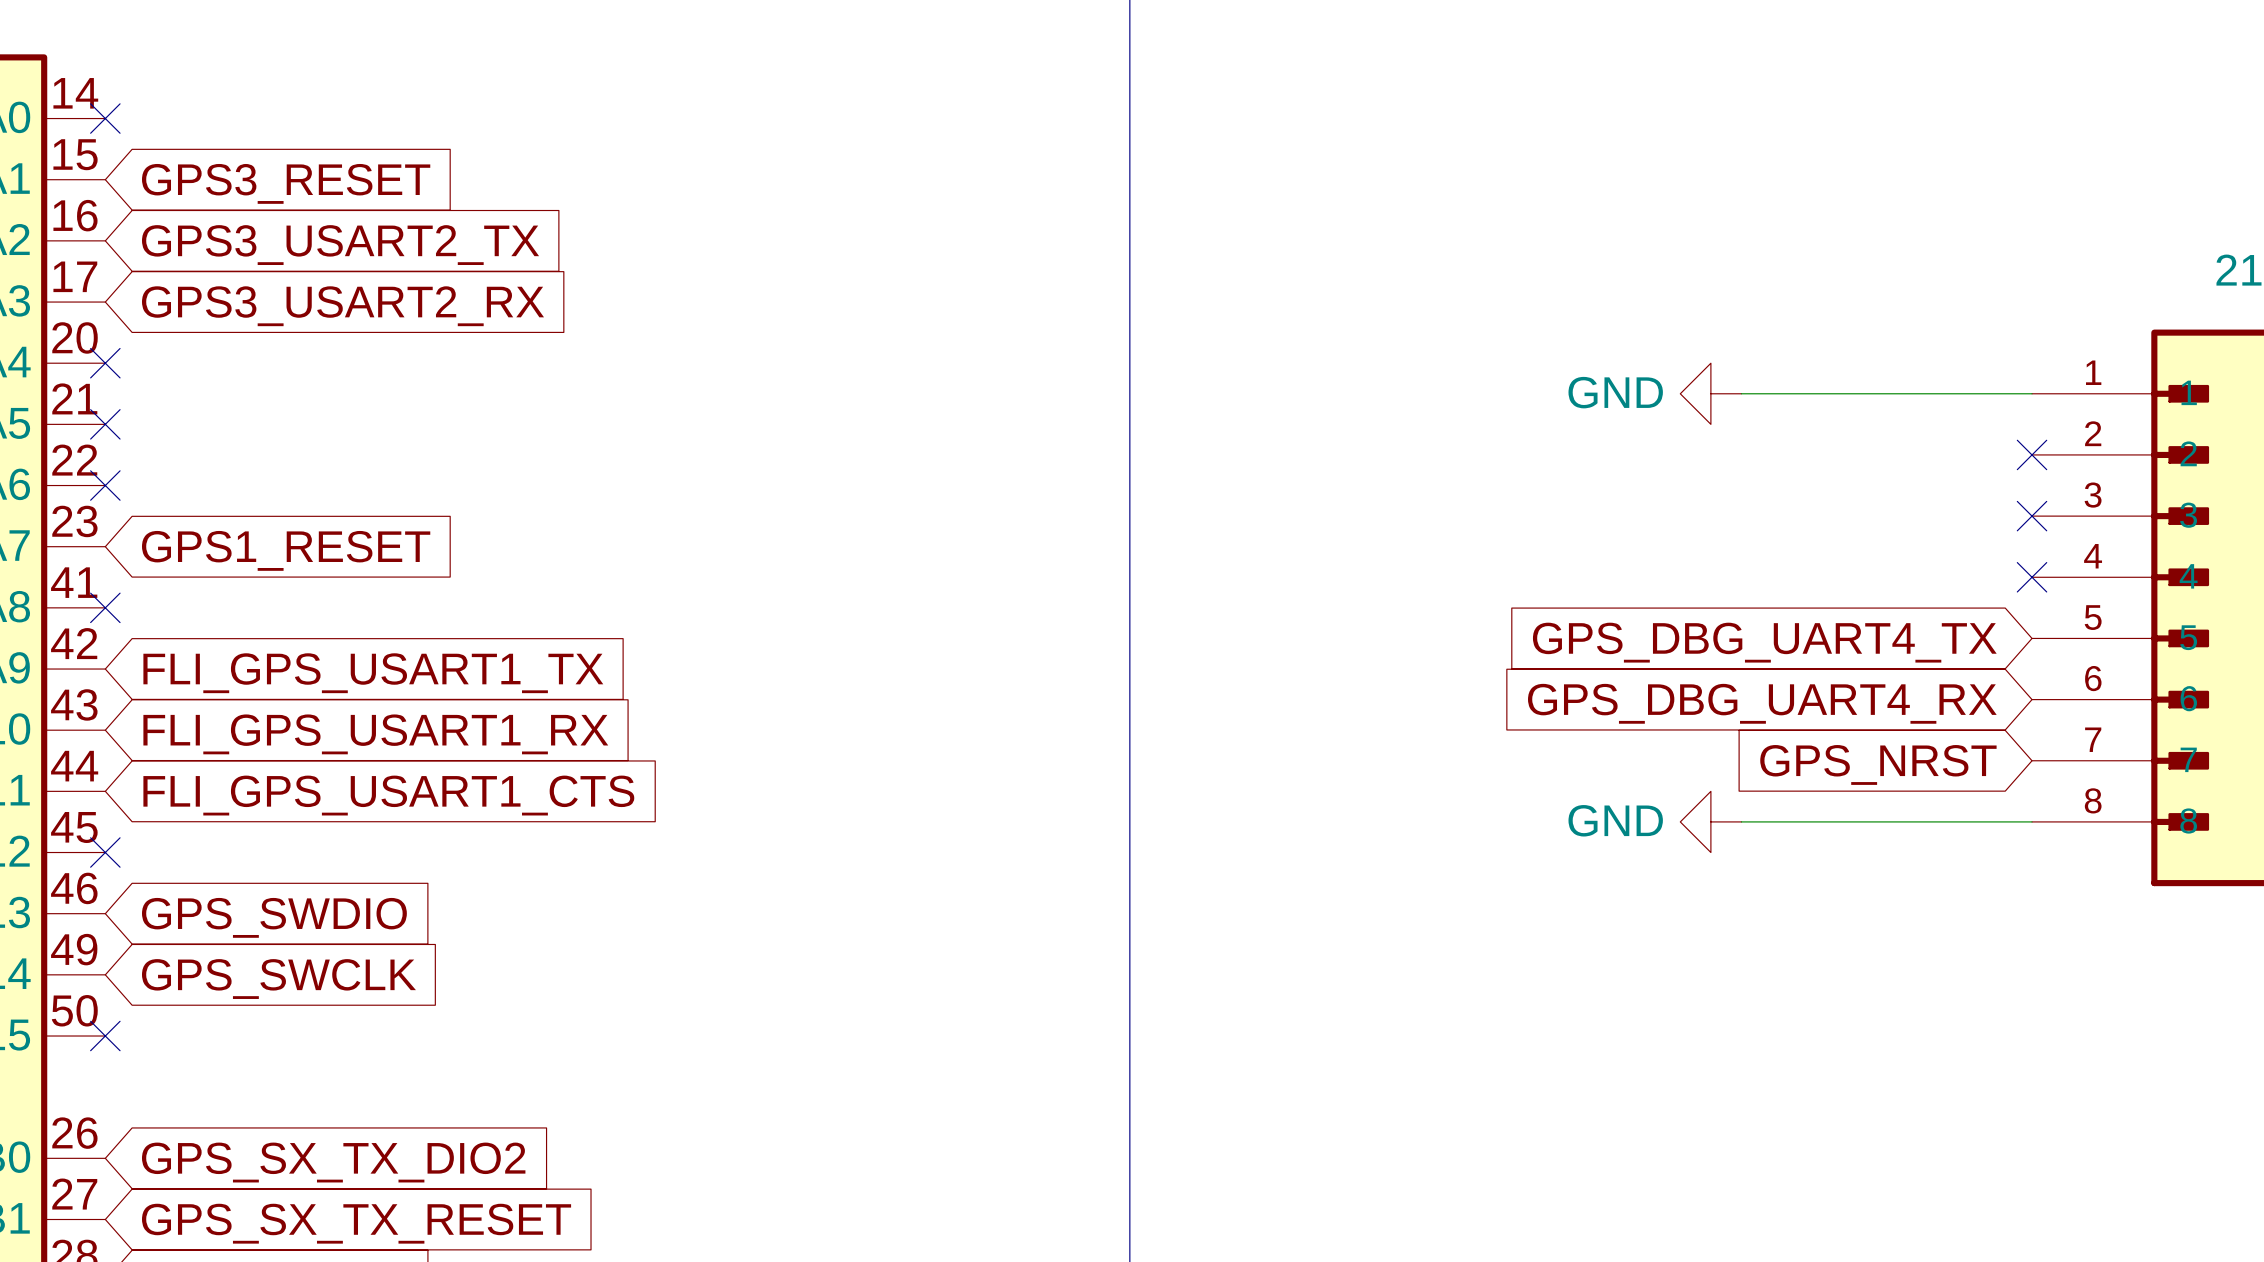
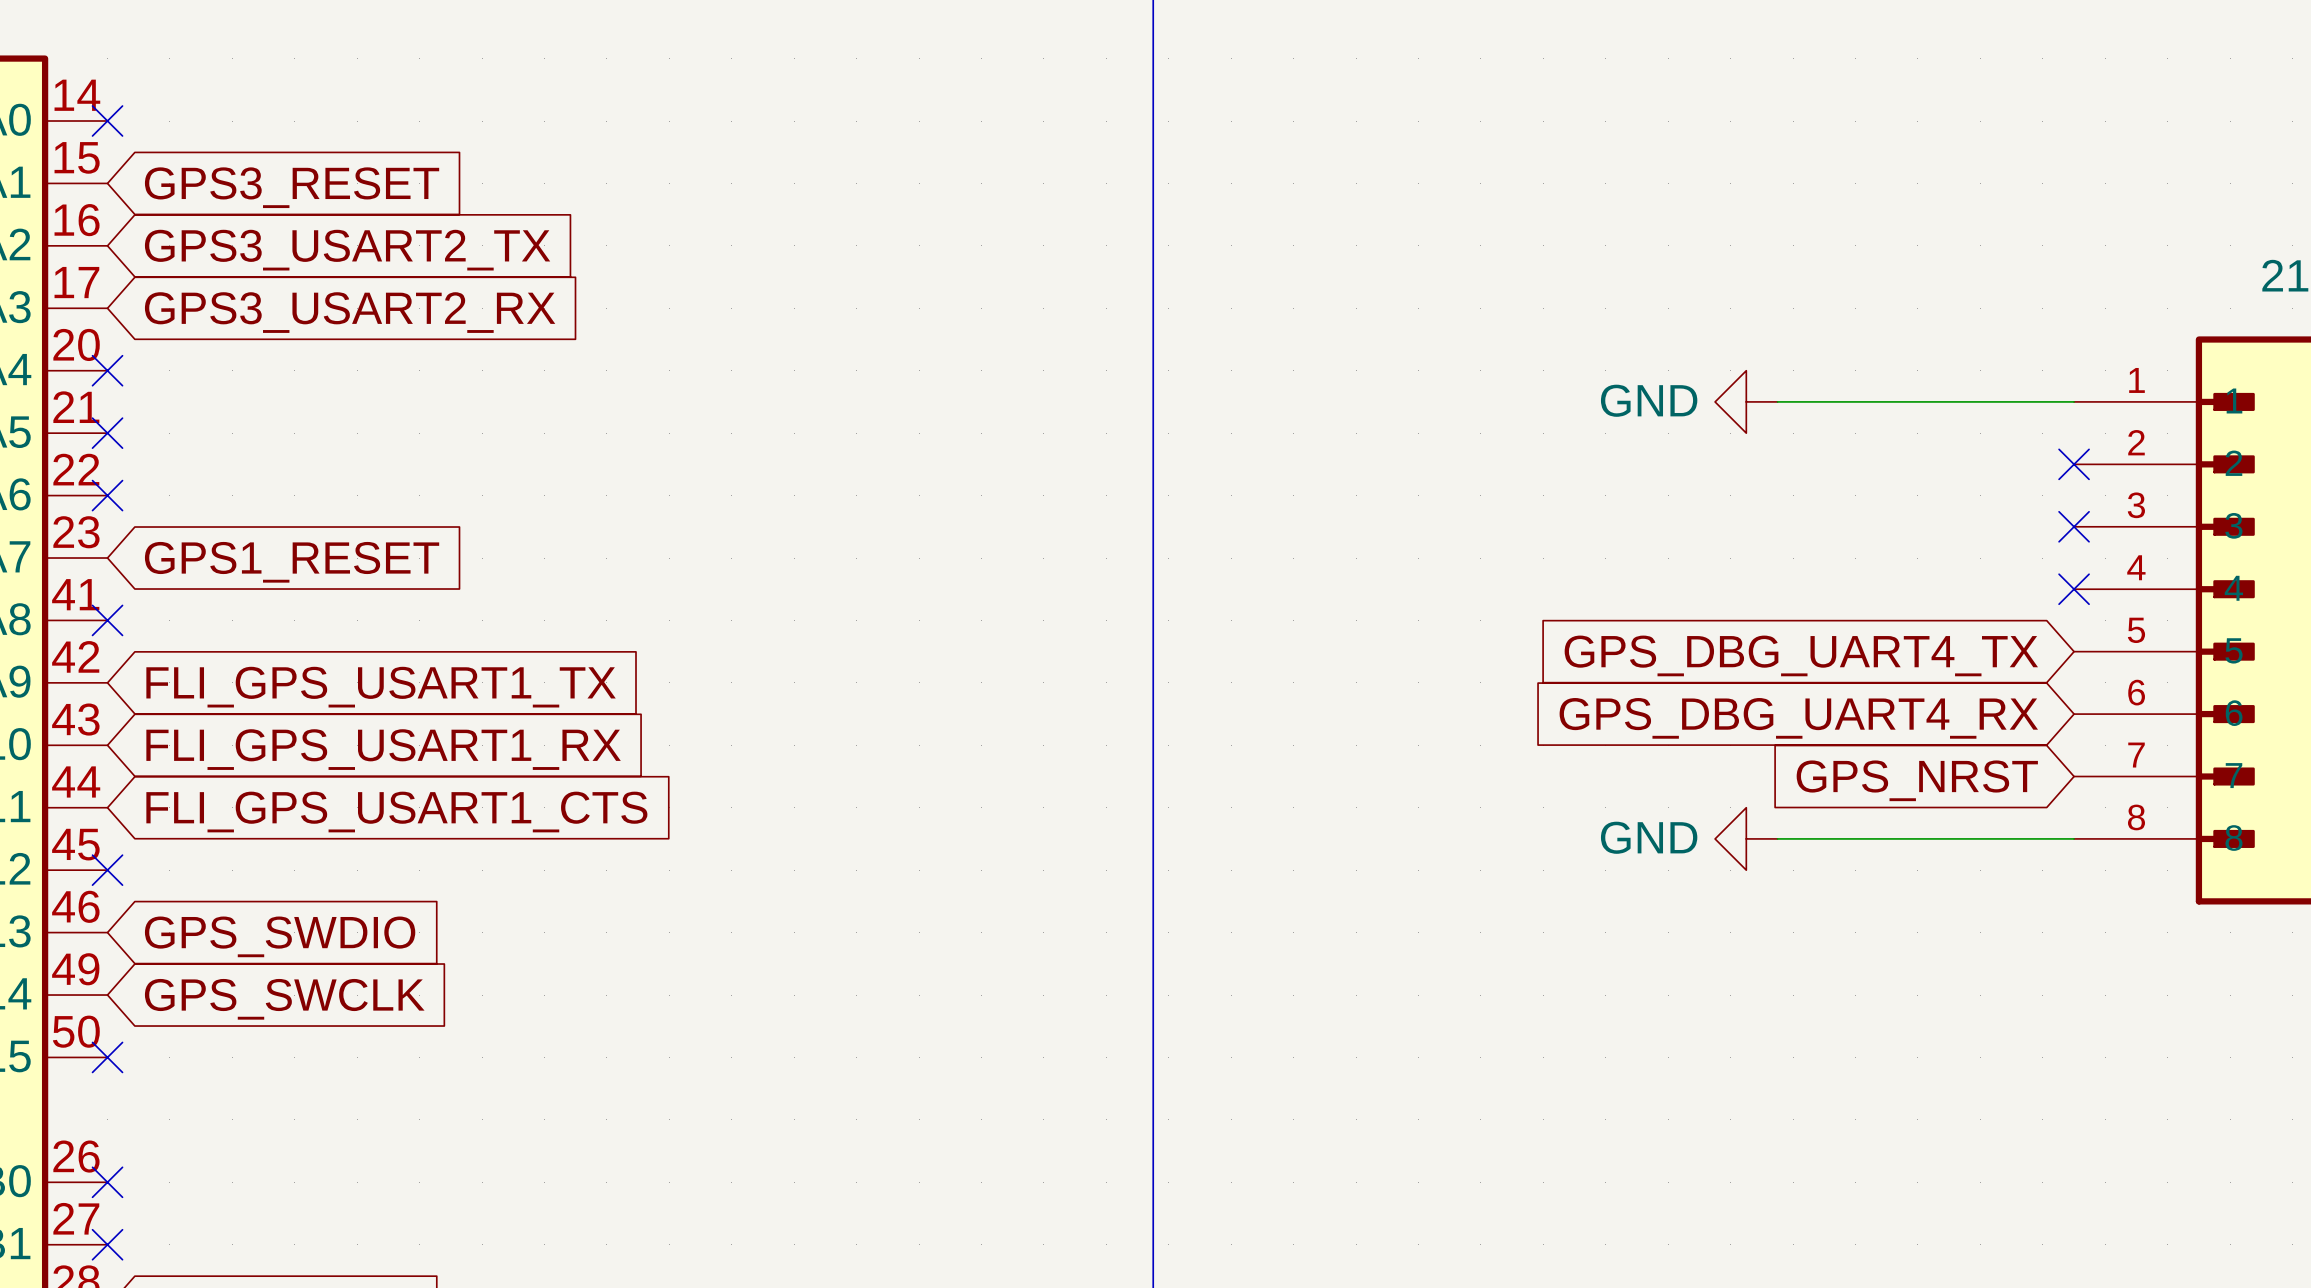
no-connect mark: none -> (107, 1182)
global label: GPS_SX_TX_DIO2 (333, 1162) -> none
no-connect mark: none -> (107, 1244)
global label: GPS_SX_TX_RESET (356, 1223) -> none

